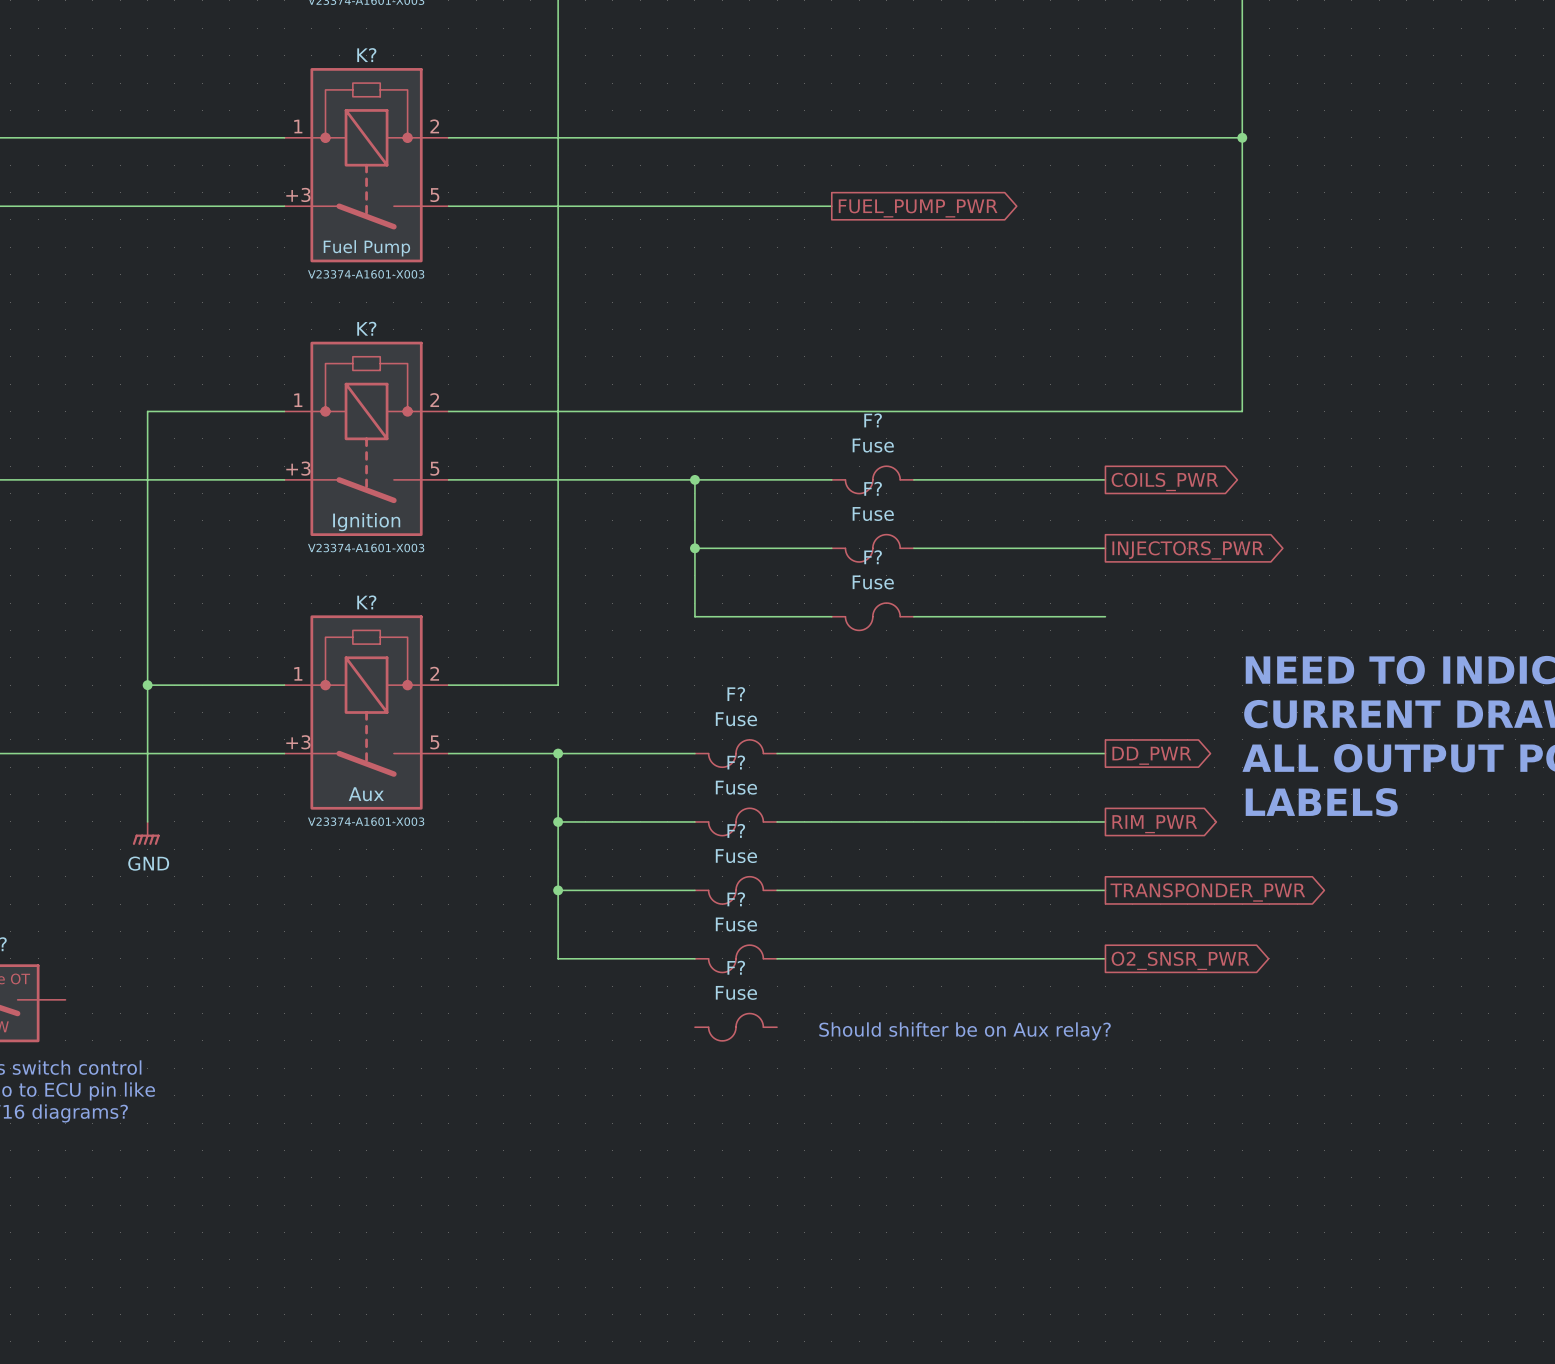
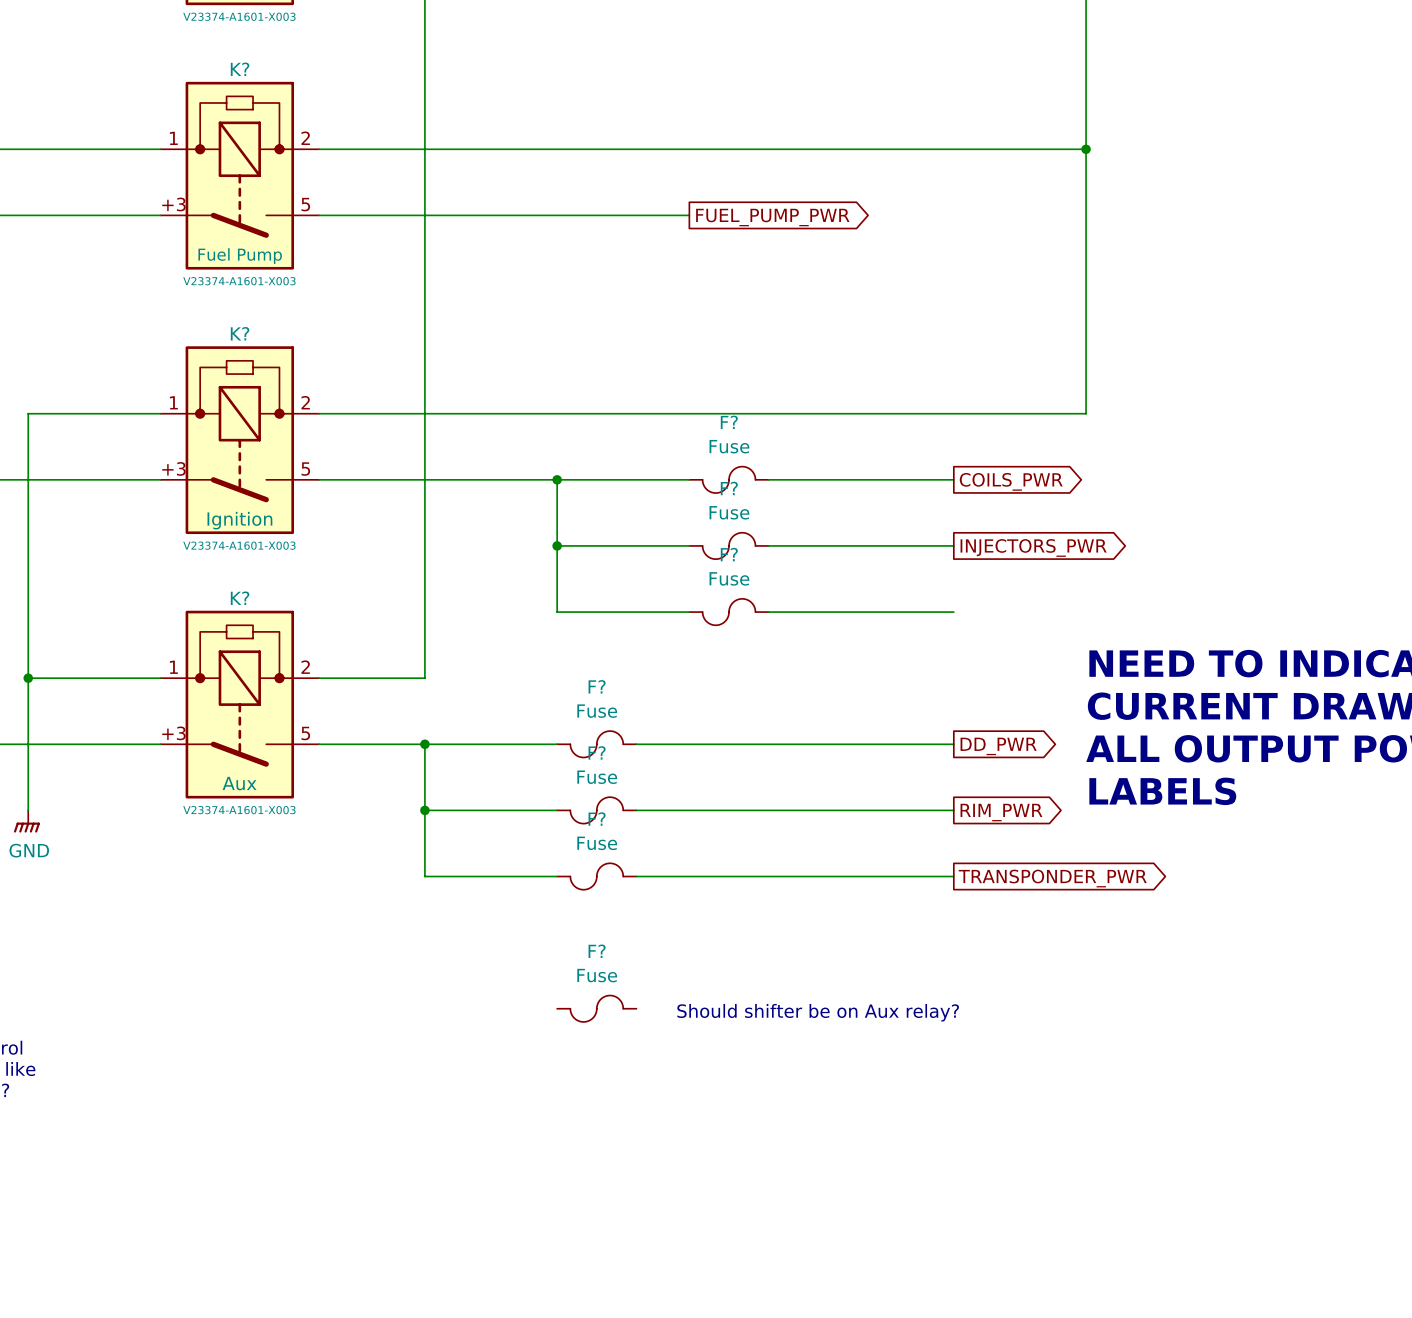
wire: (558, 890) (558, 958) (694, 958) -> none
junction: (558, 890) -> none
F?: Fuse (736, 958) -> none
wire: (777, 958) (1105, 958) -> none
global label: O2_SNSR_PWR (1180, 960) -> none

